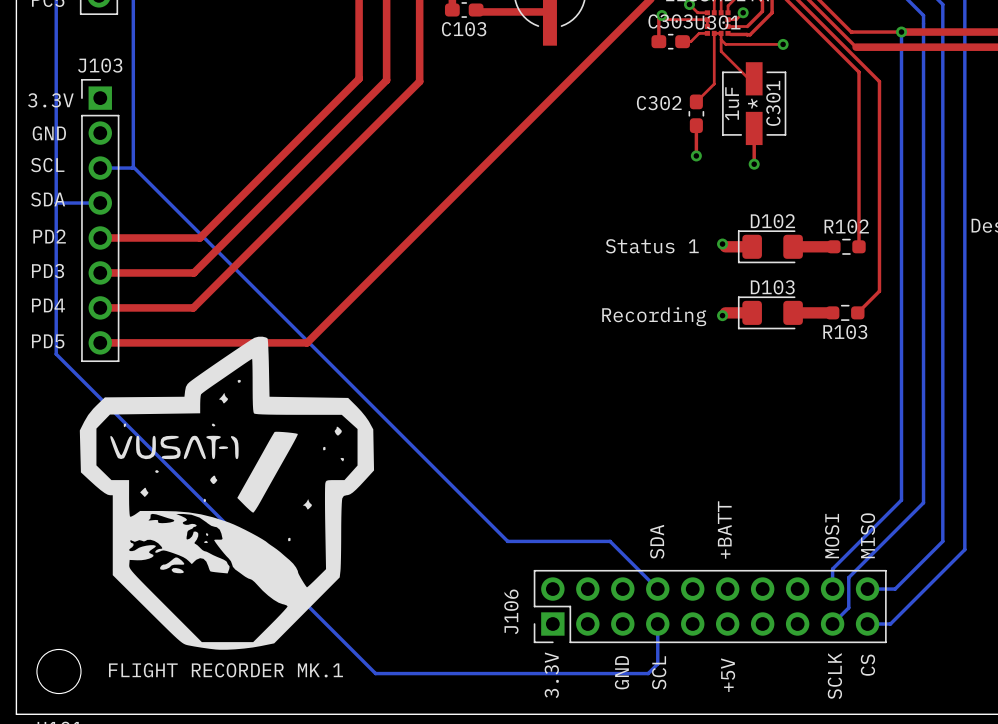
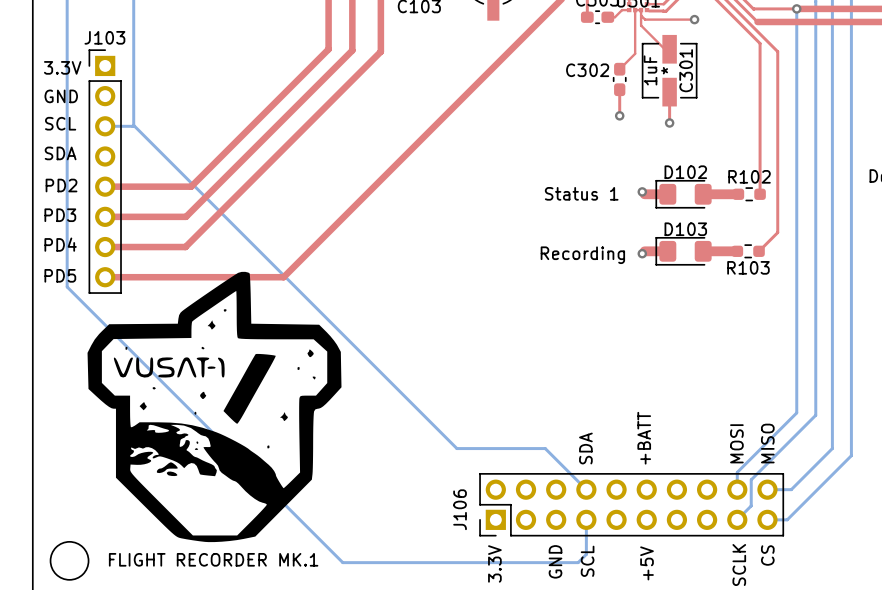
bottom track: (56, 203) (100, 203) -> none

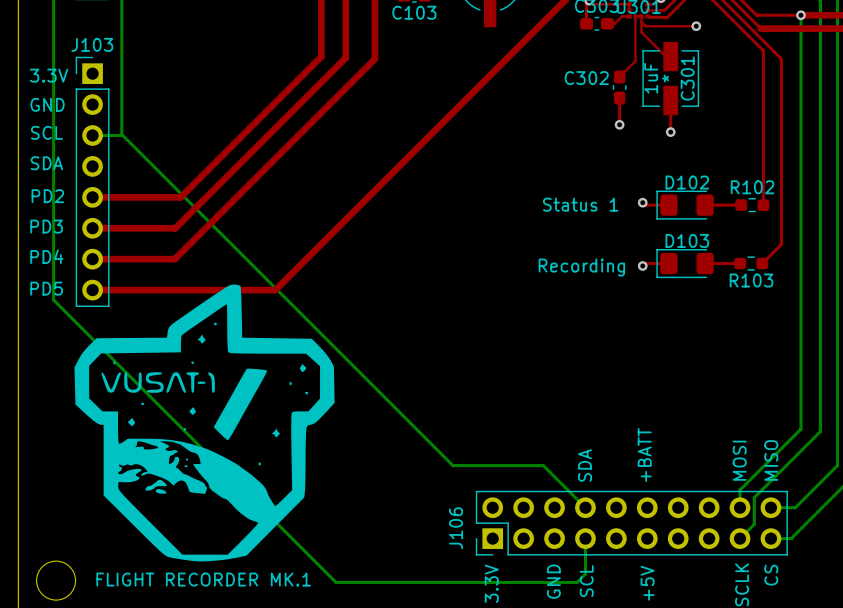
top track width: thick (644, 194) (667, 194) -> thin (645, 205) (668, 205)
top track width: thick (703, 194) (738, 194) -> thin (705, 205) (741, 205)
top track width: thick (644, 251) (667, 251) -> thin (645, 263) (668, 263)
top track width: thick (703, 251) (737, 251) -> thin (705, 263) (740, 263)

